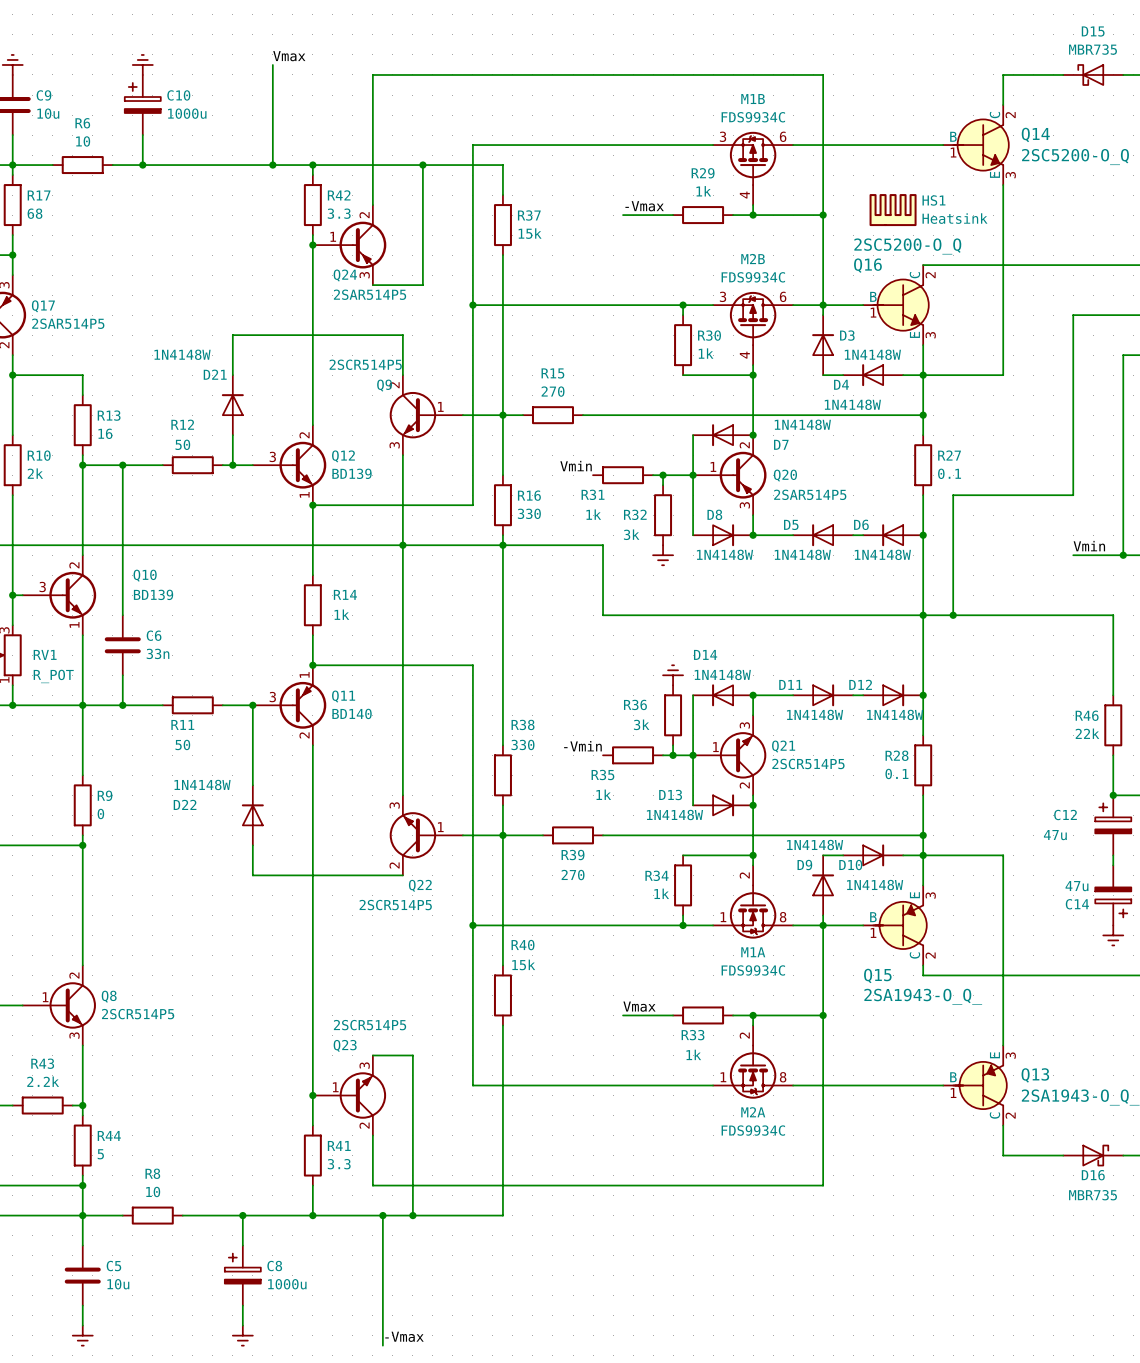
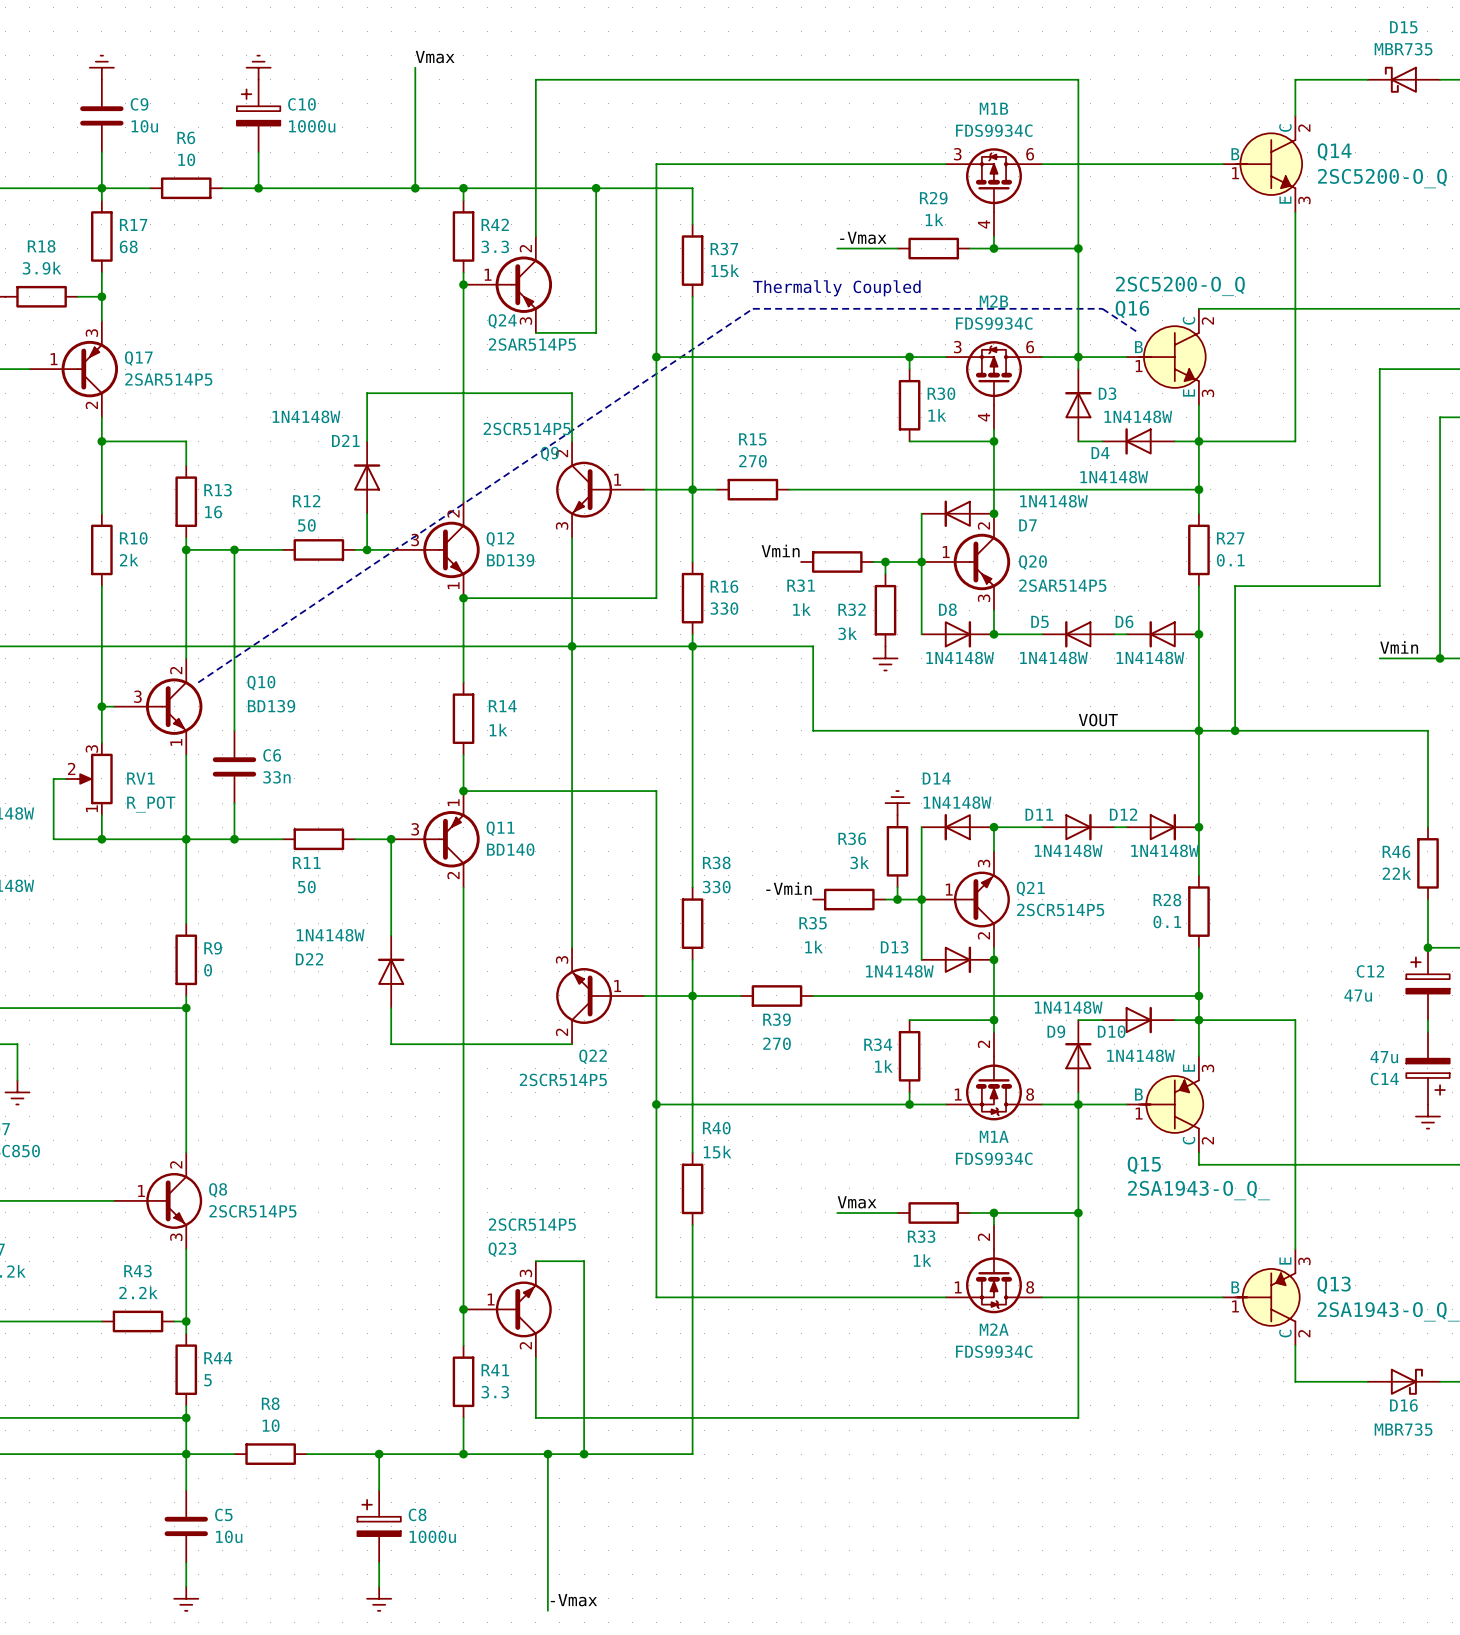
HS1: Heatsink (893, 210) -> none
text: none -> Thermally Coupled (836, 288)
line: none -> (1138, 332) (1102, 308) (752, 308) (198, 682)
label: none -> VOUT (1098, 720)

